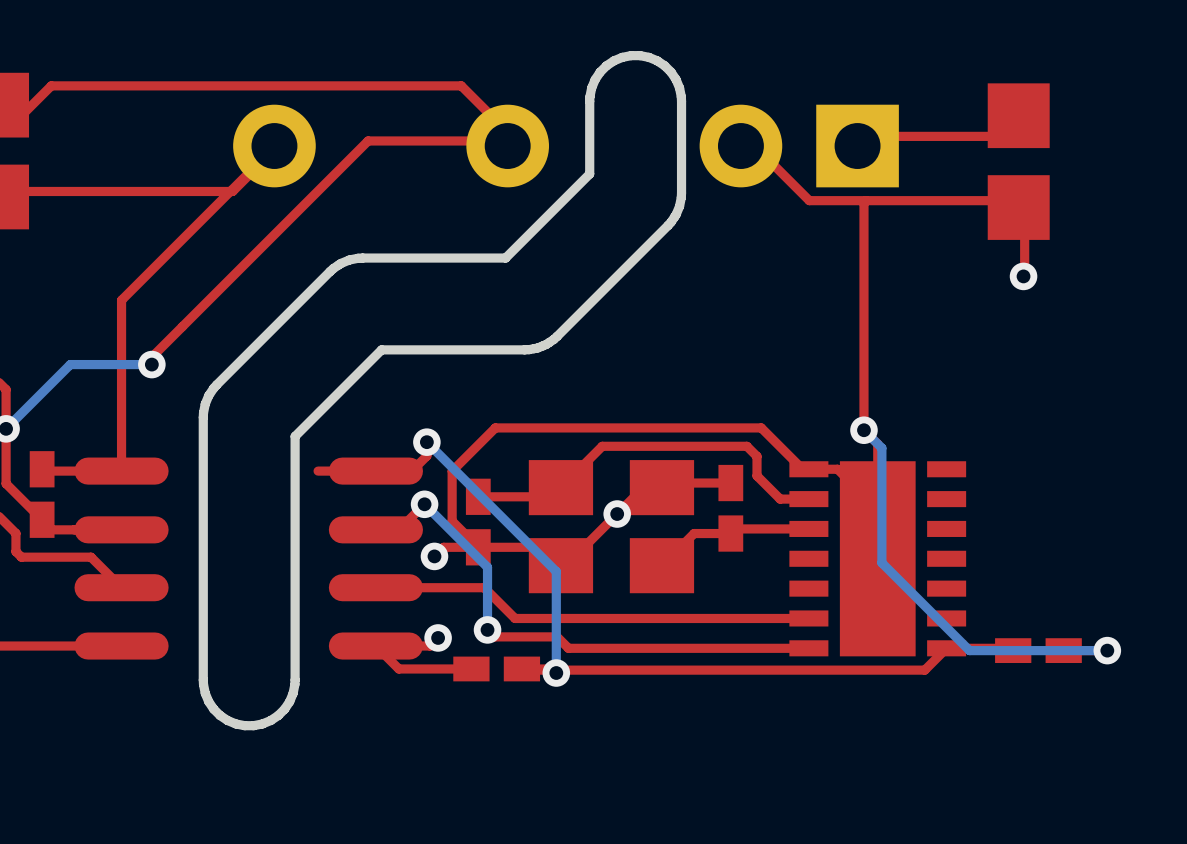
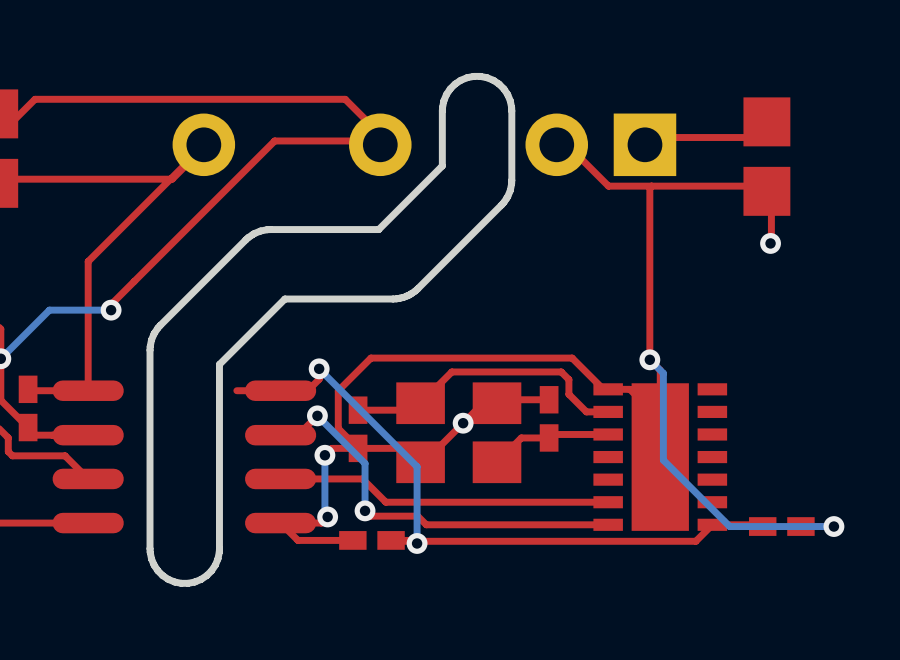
bottom track: none -> (324, 455) (324, 514) (327, 516)

